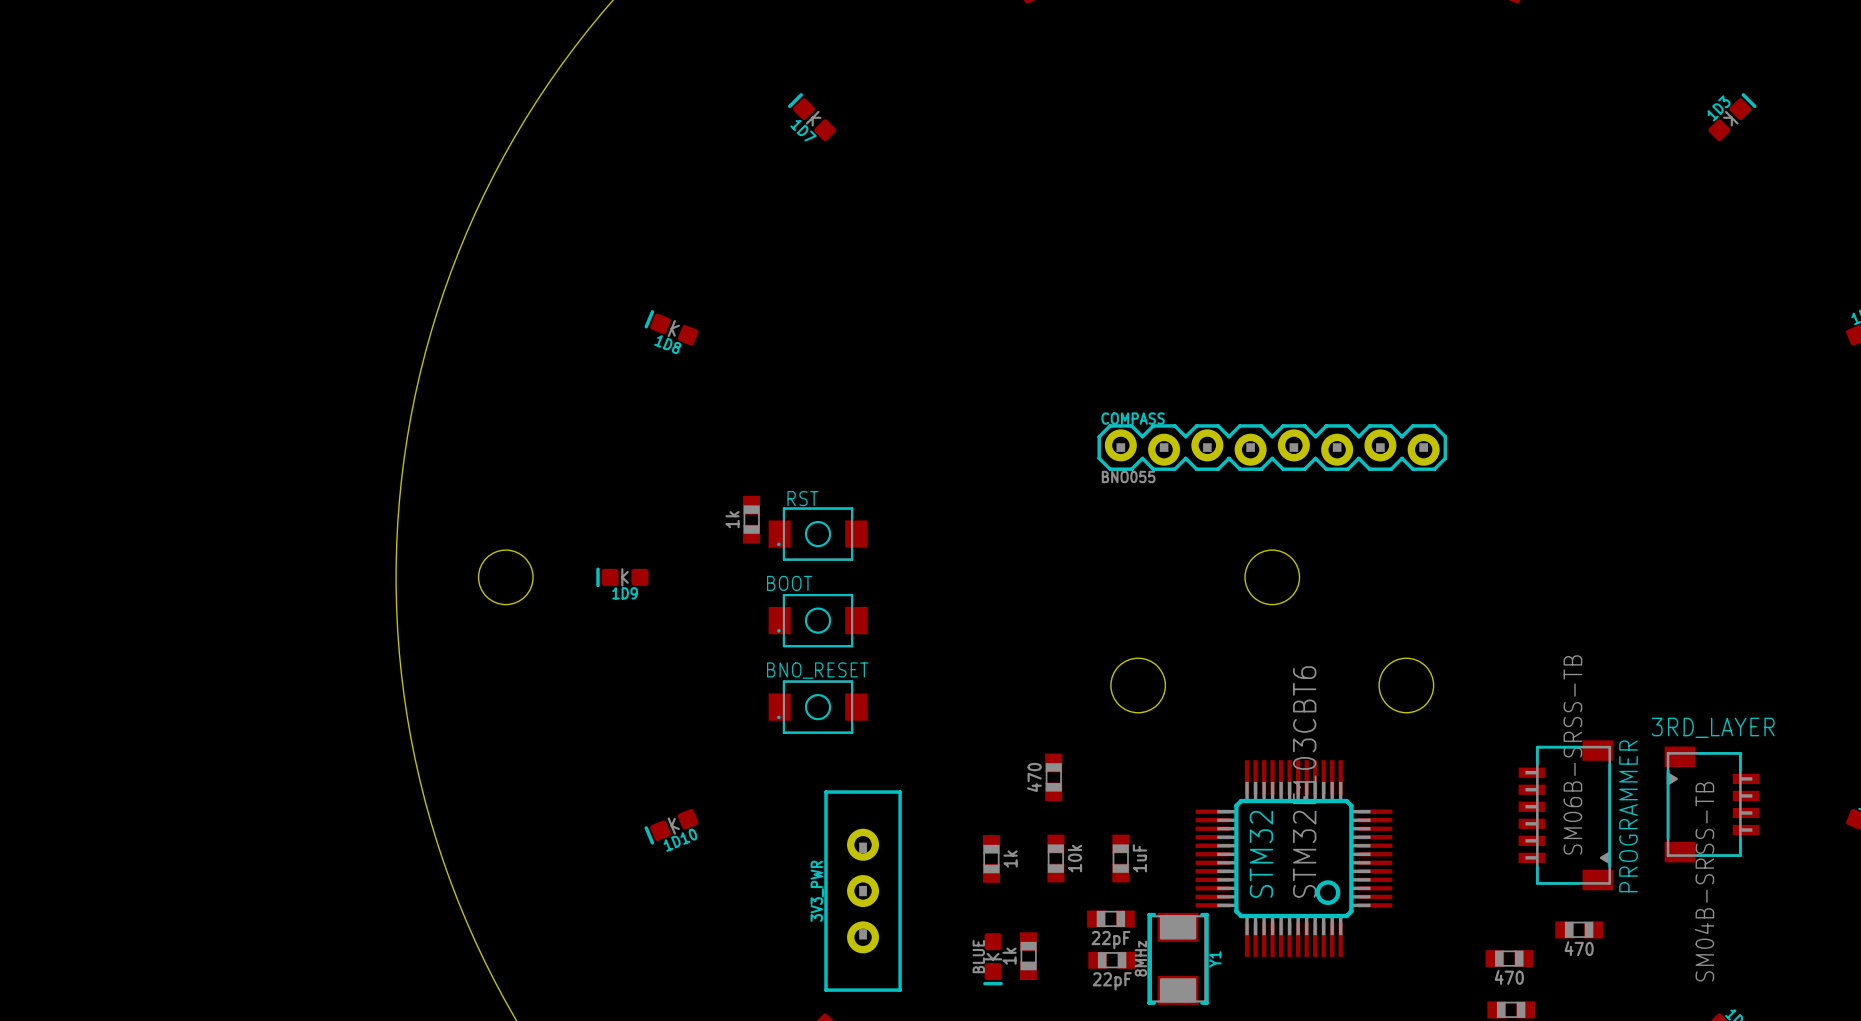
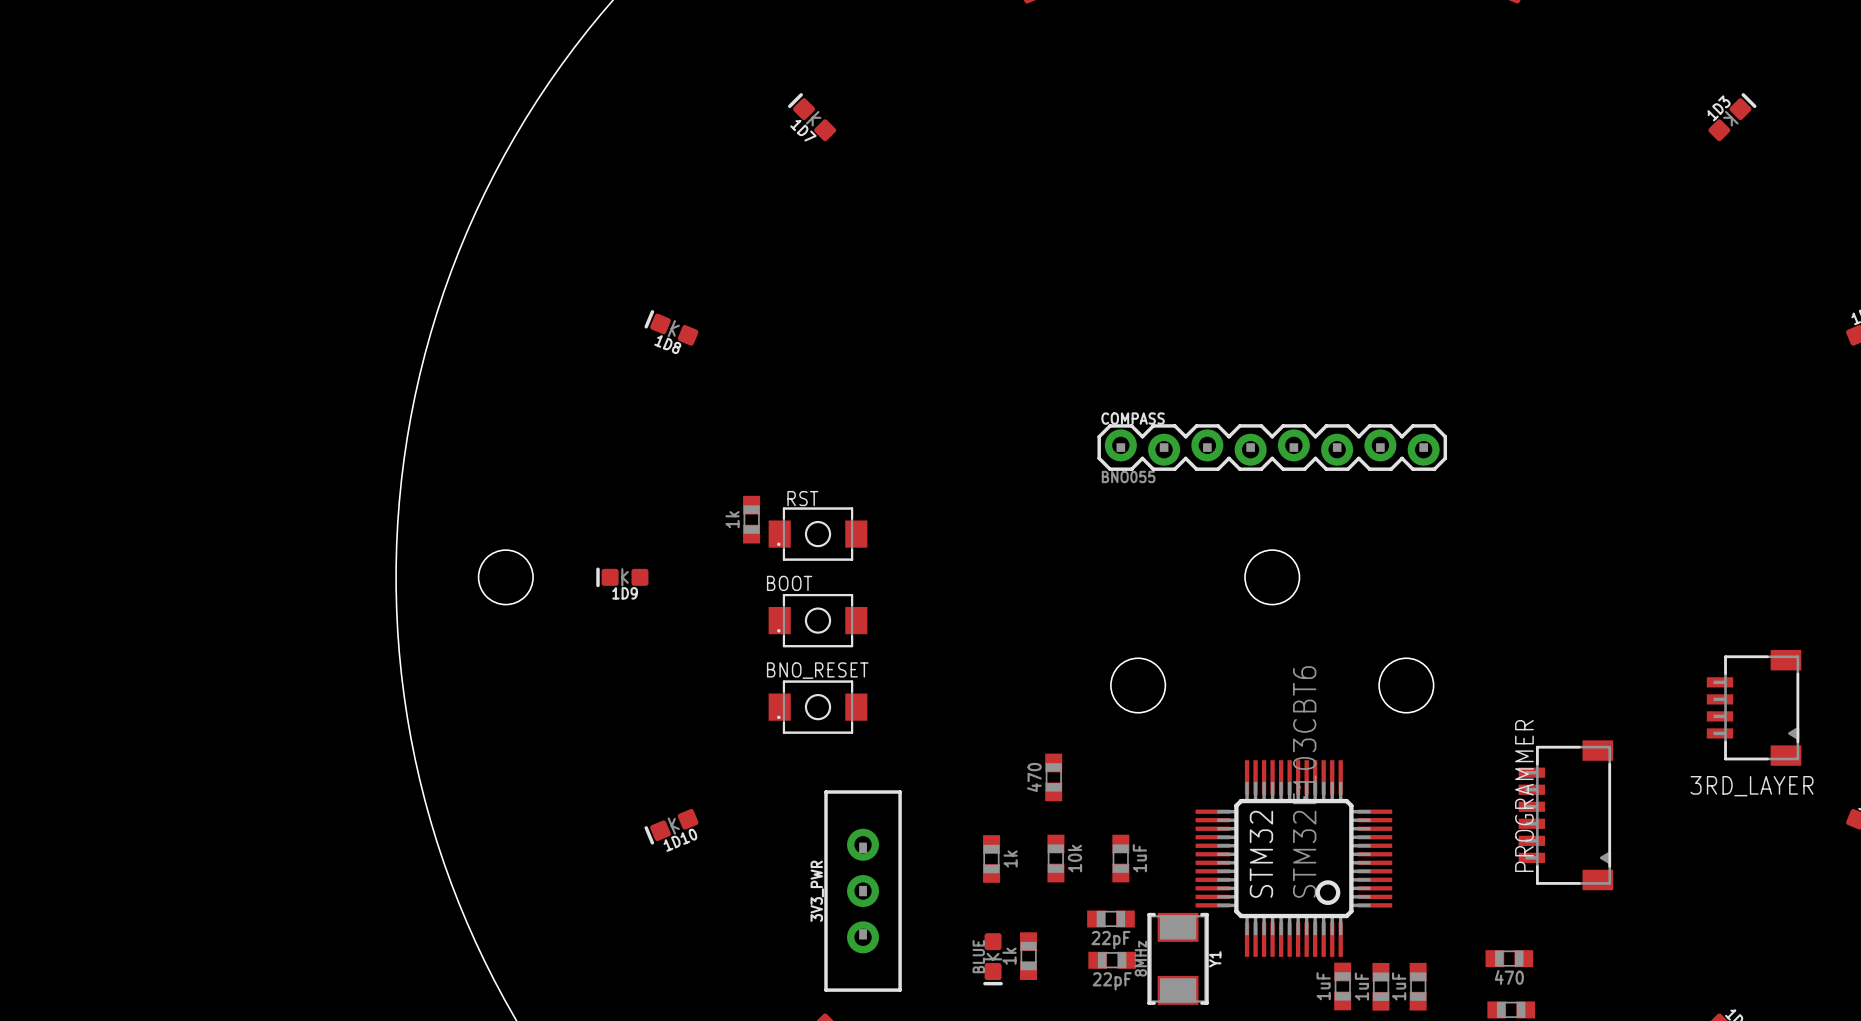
PROGRAMMER value: SM06B-SRSS-TB (1572, 754) -> none
3RD_LAYER rotation: 0° (1711, 804) -> 180° (1754, 707)
3RD_LAYER position: (1711, 804) -> (1754, 707)
PROGRAMMER name position: PROGRAMMER (1628, 816) -> PROGRAMMER (1524, 795)
3RD_LAYER value: SM04B-SRSS-TB (1704, 881) -> none
part: 470 (1579, 929) -> none
part: none -> 1uF (1342, 986)
part: none -> 1uF (1380, 986)
part: none -> 1uF (1418, 986)

